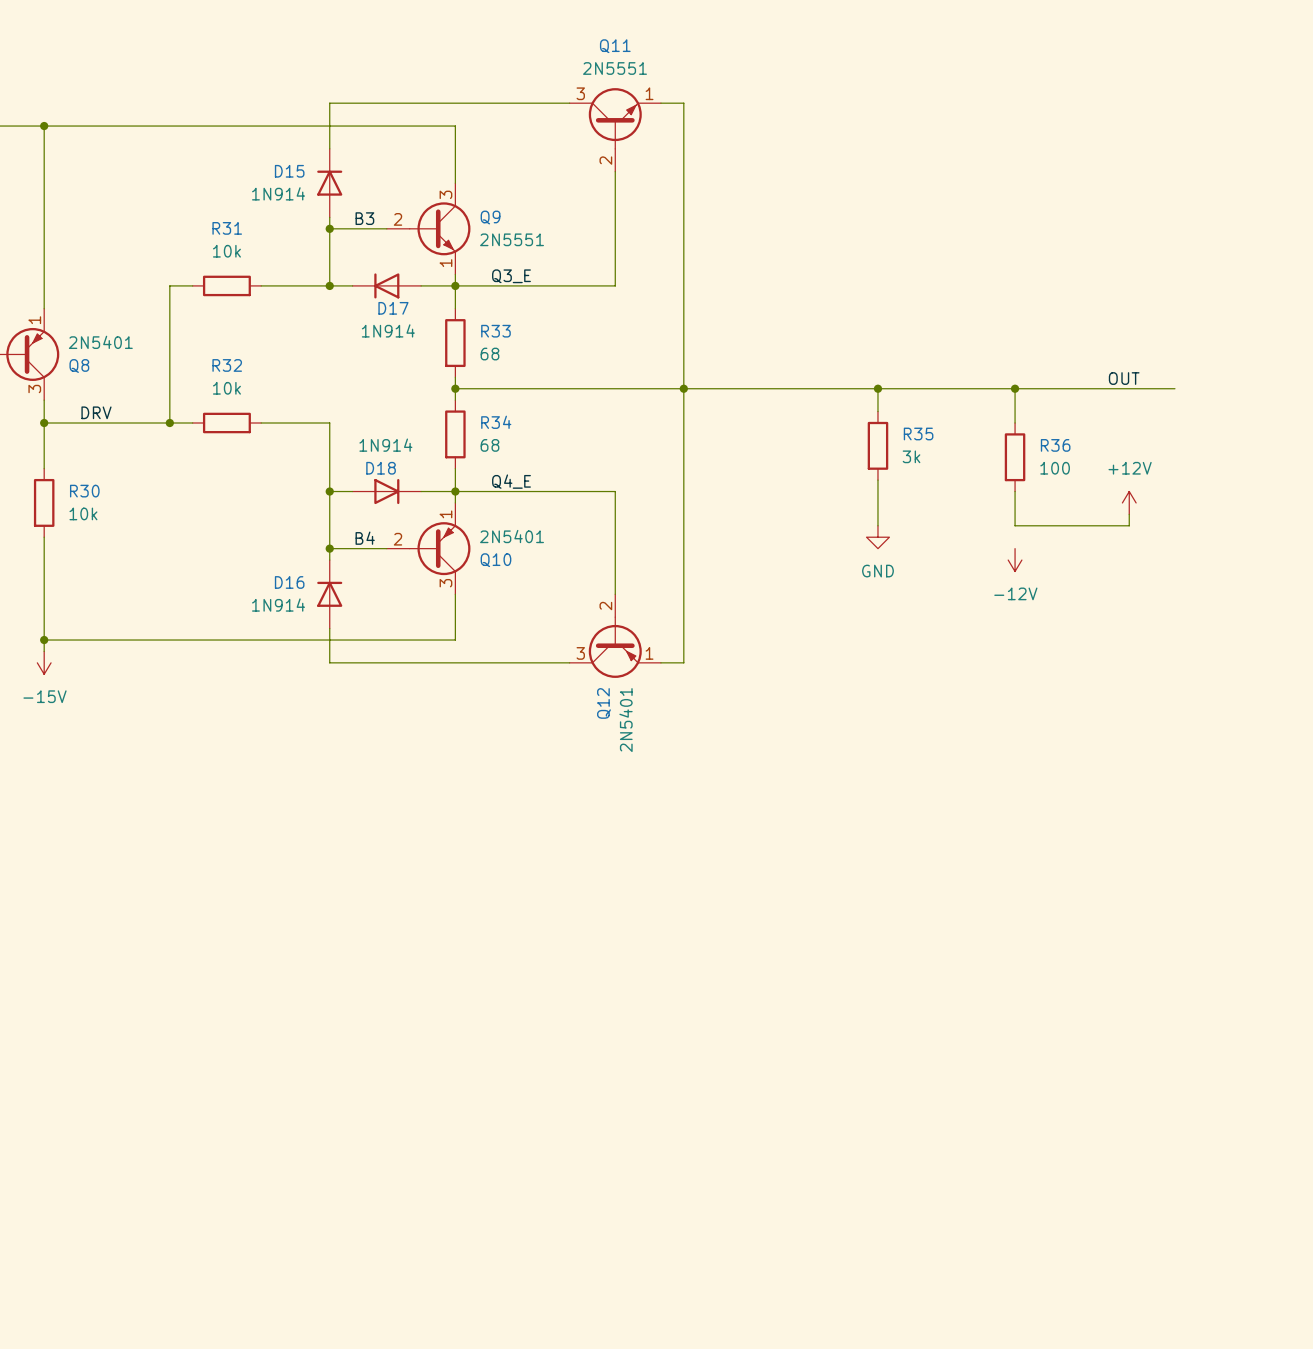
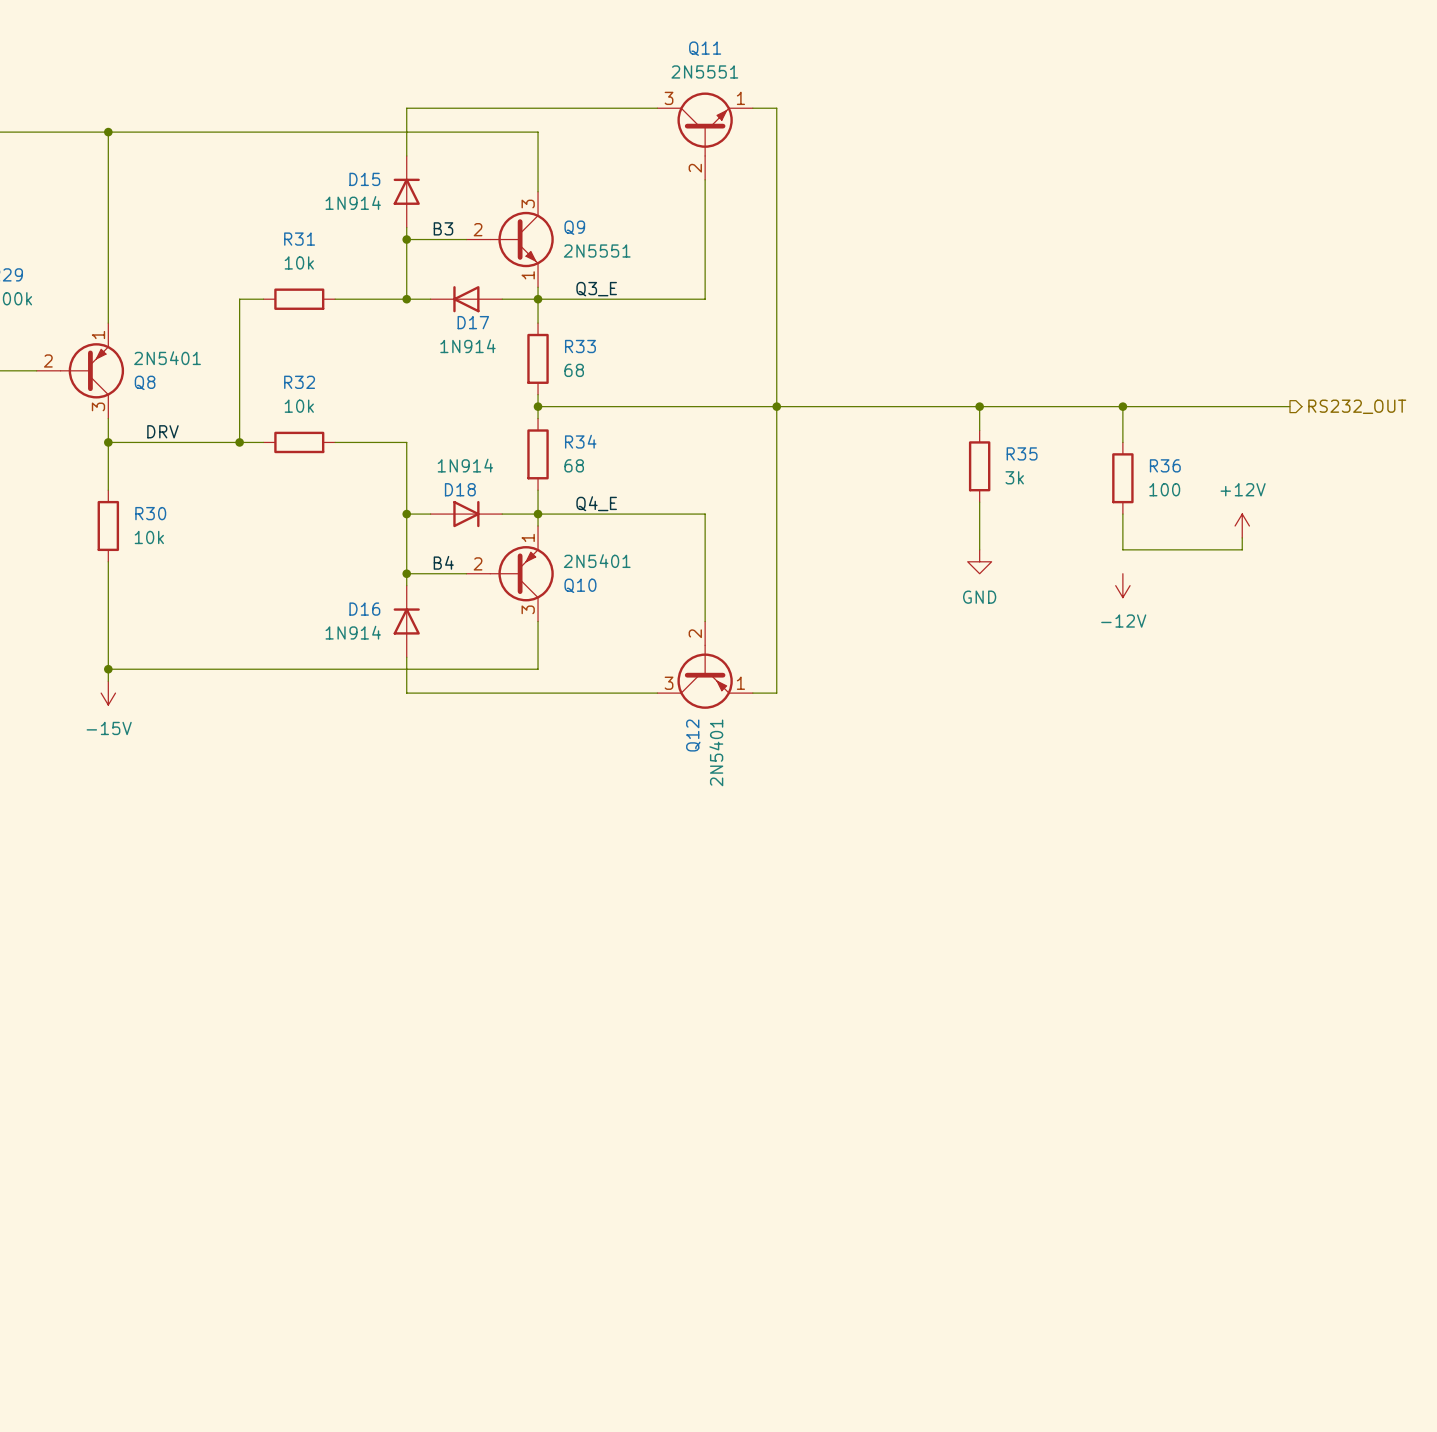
label: OUT (1124, 378) -> none
hierarchical label: none -> RS232_OUT (1357, 406)

